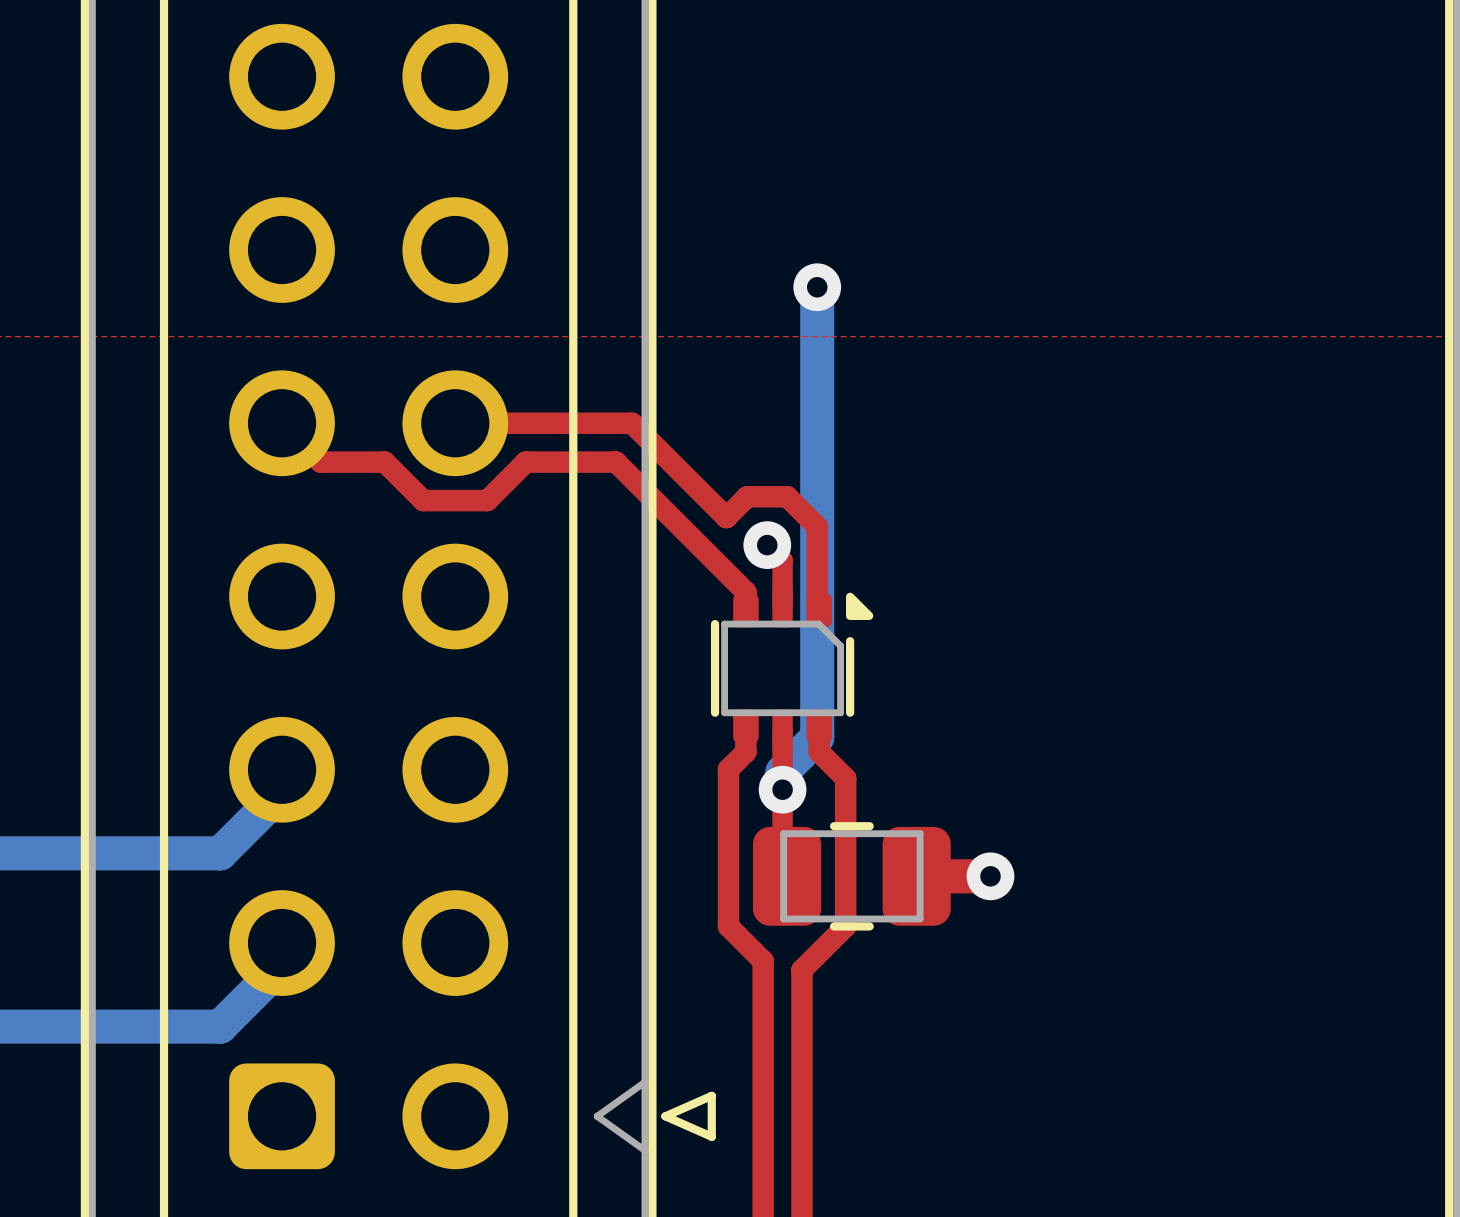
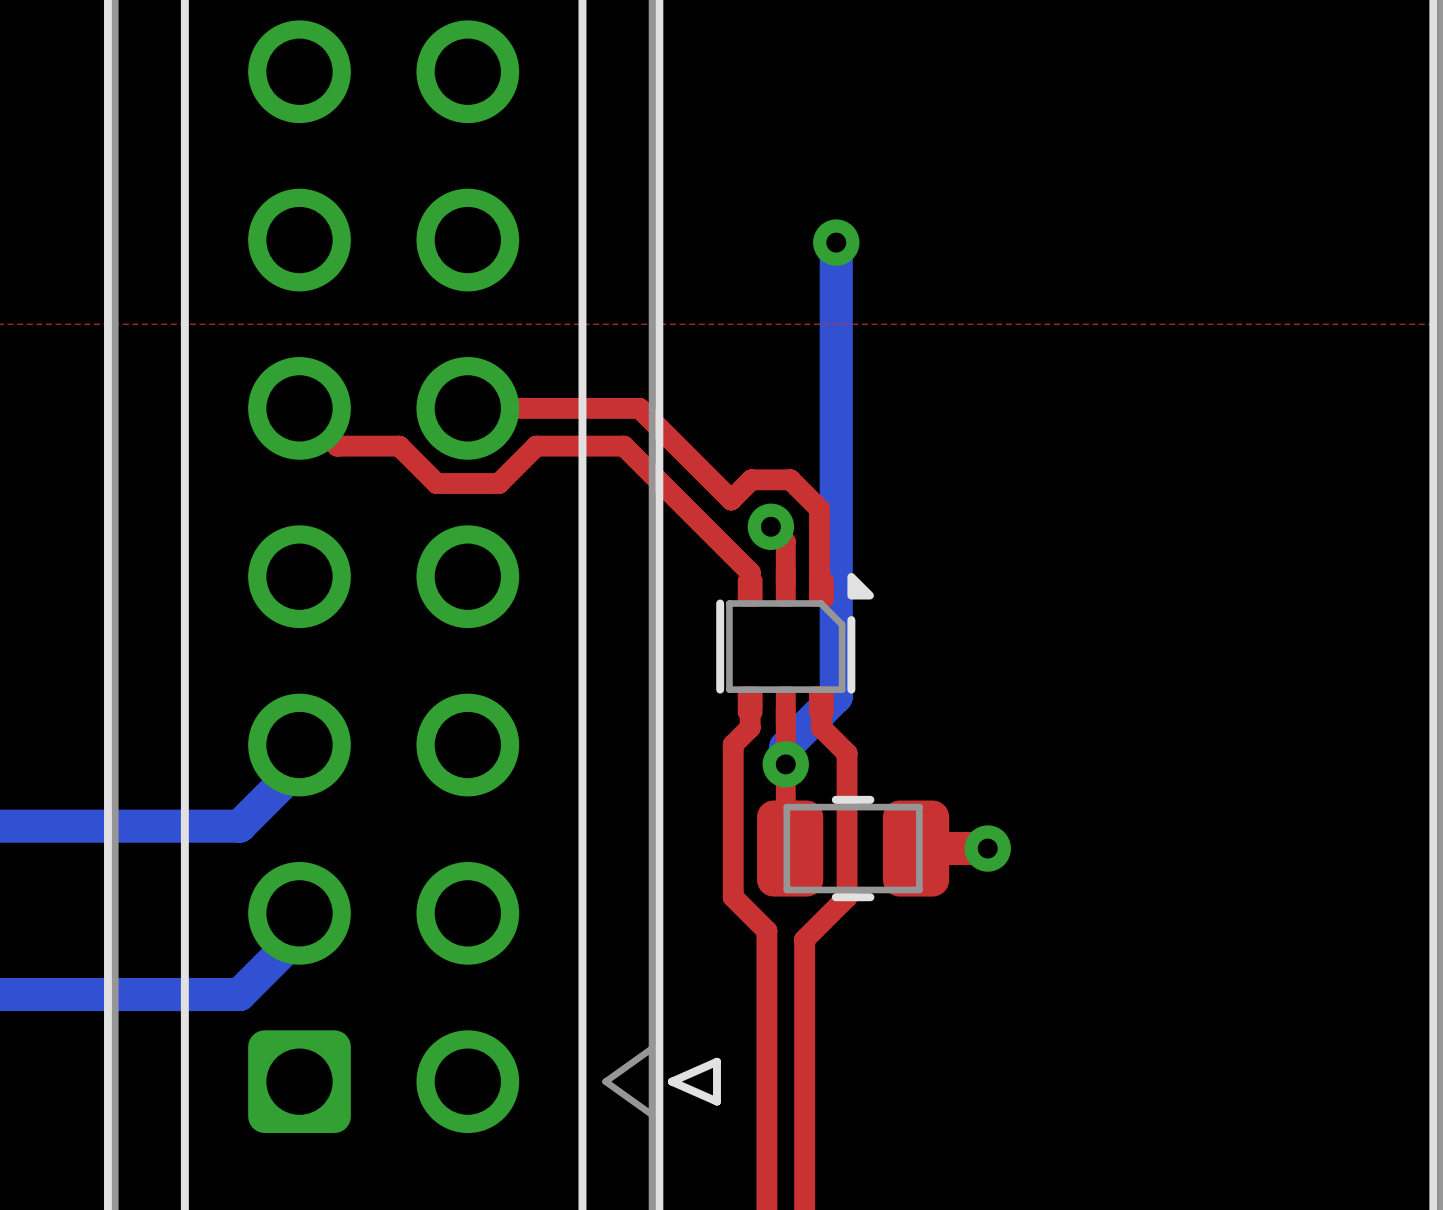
bottom track: (817, 287) (817, 737) -> (836, 242) (836, 696) (819, 713)
via position: (817, 287) -> (836, 242)

